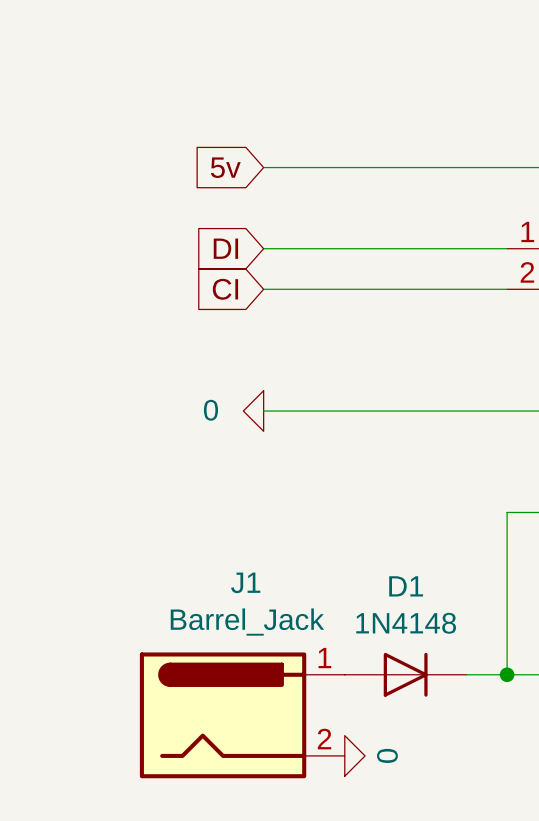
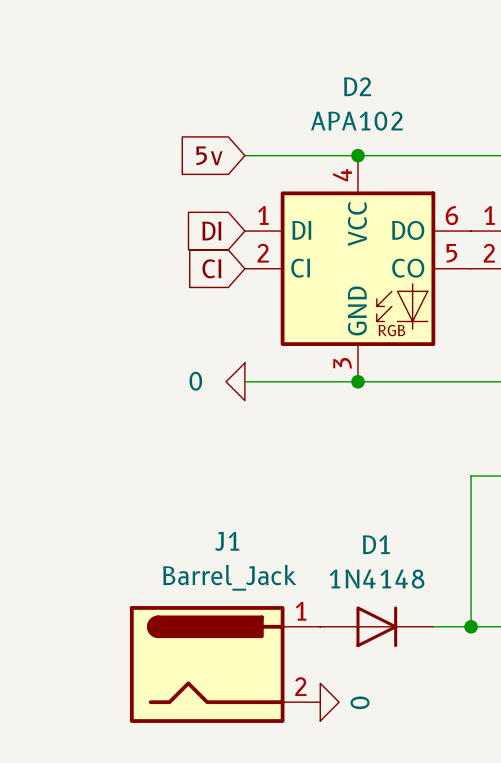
junction: none -> (357, 155)
D2: none -> APA102 (357, 268)
junction: none -> (357, 381)

